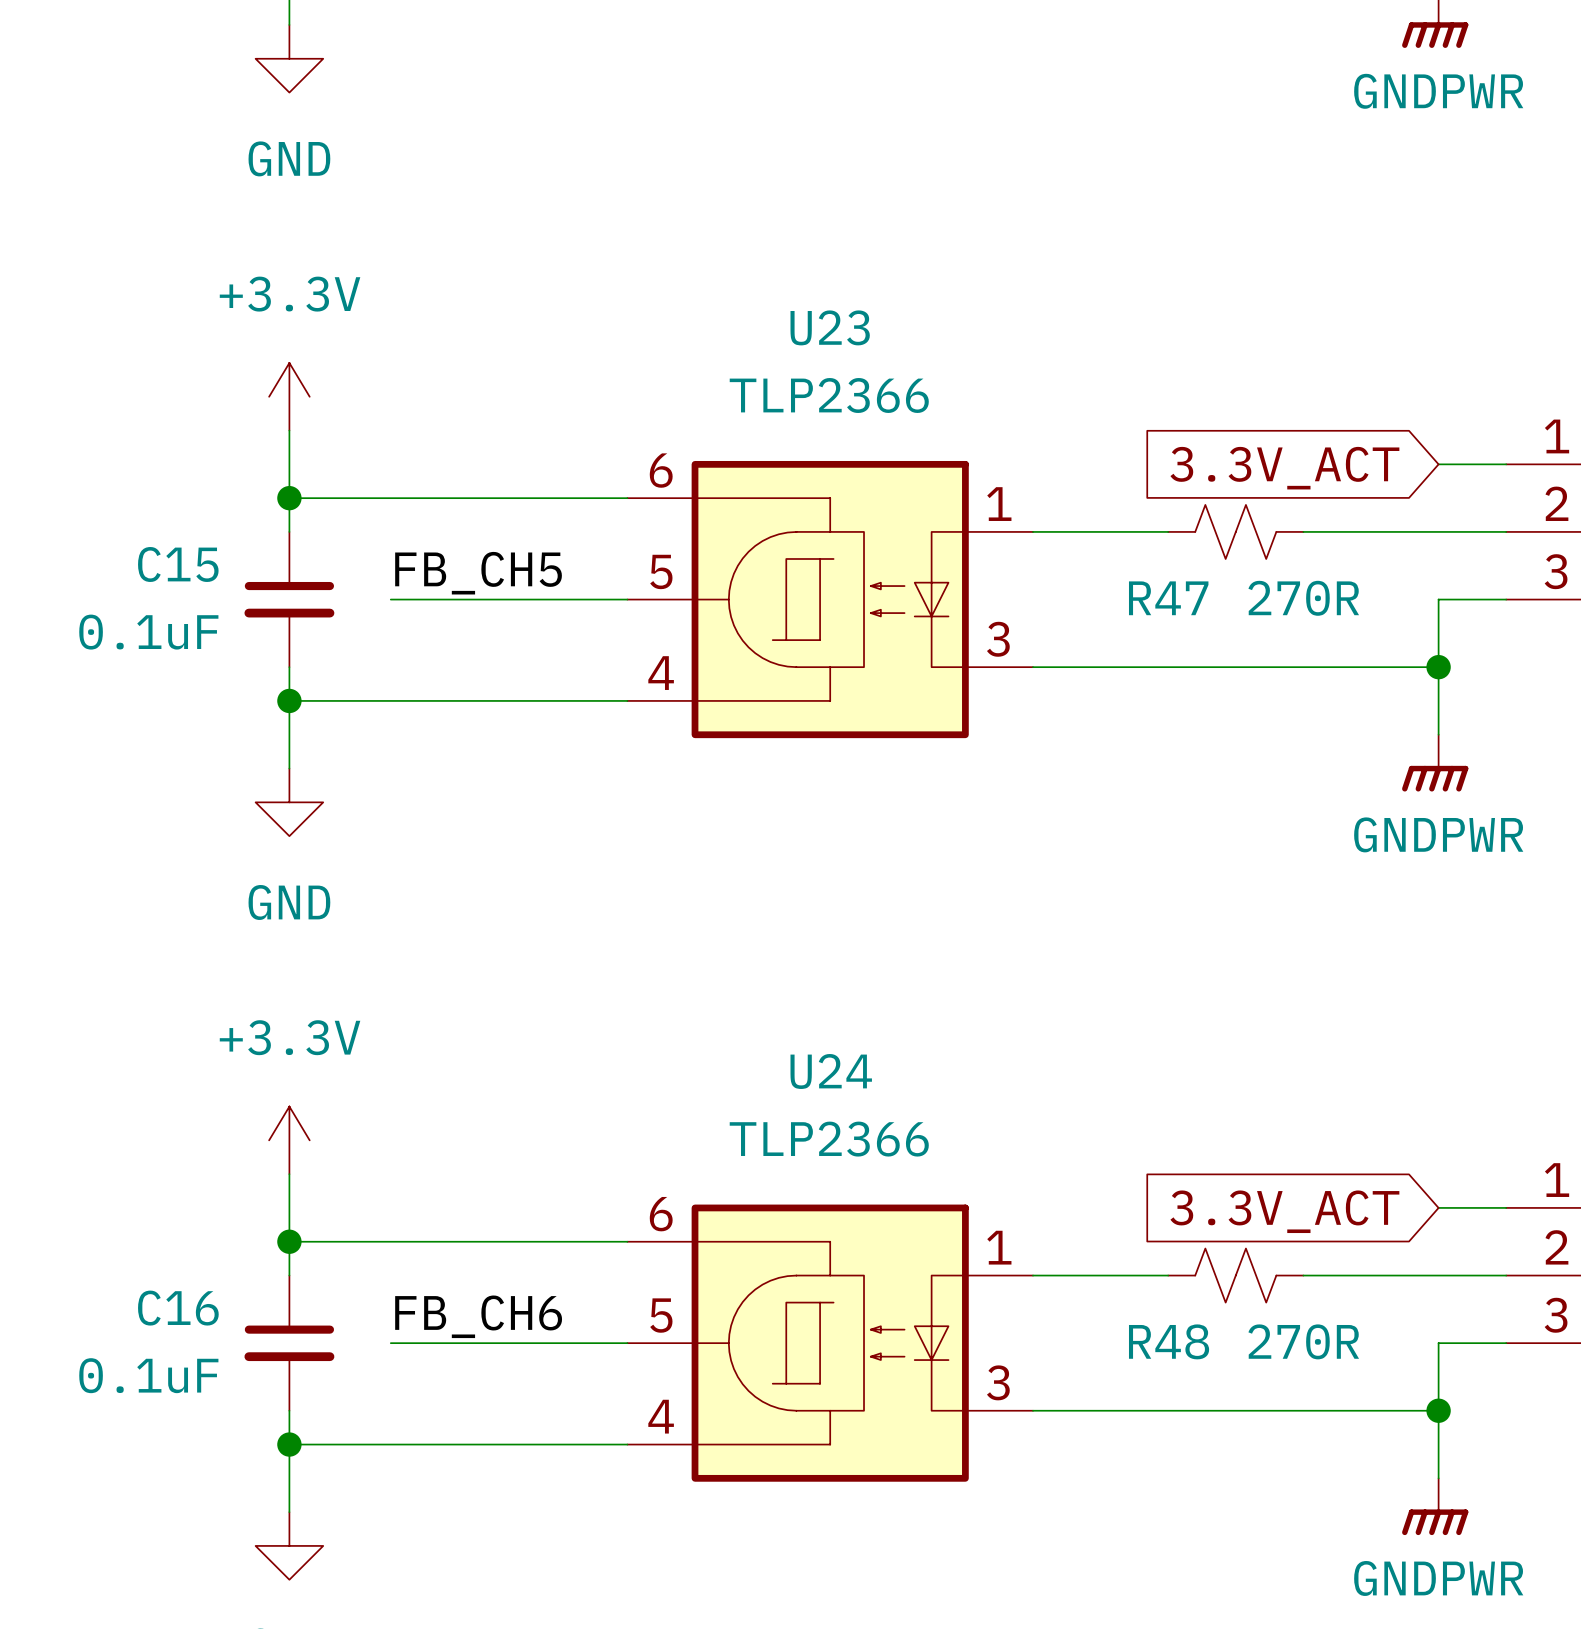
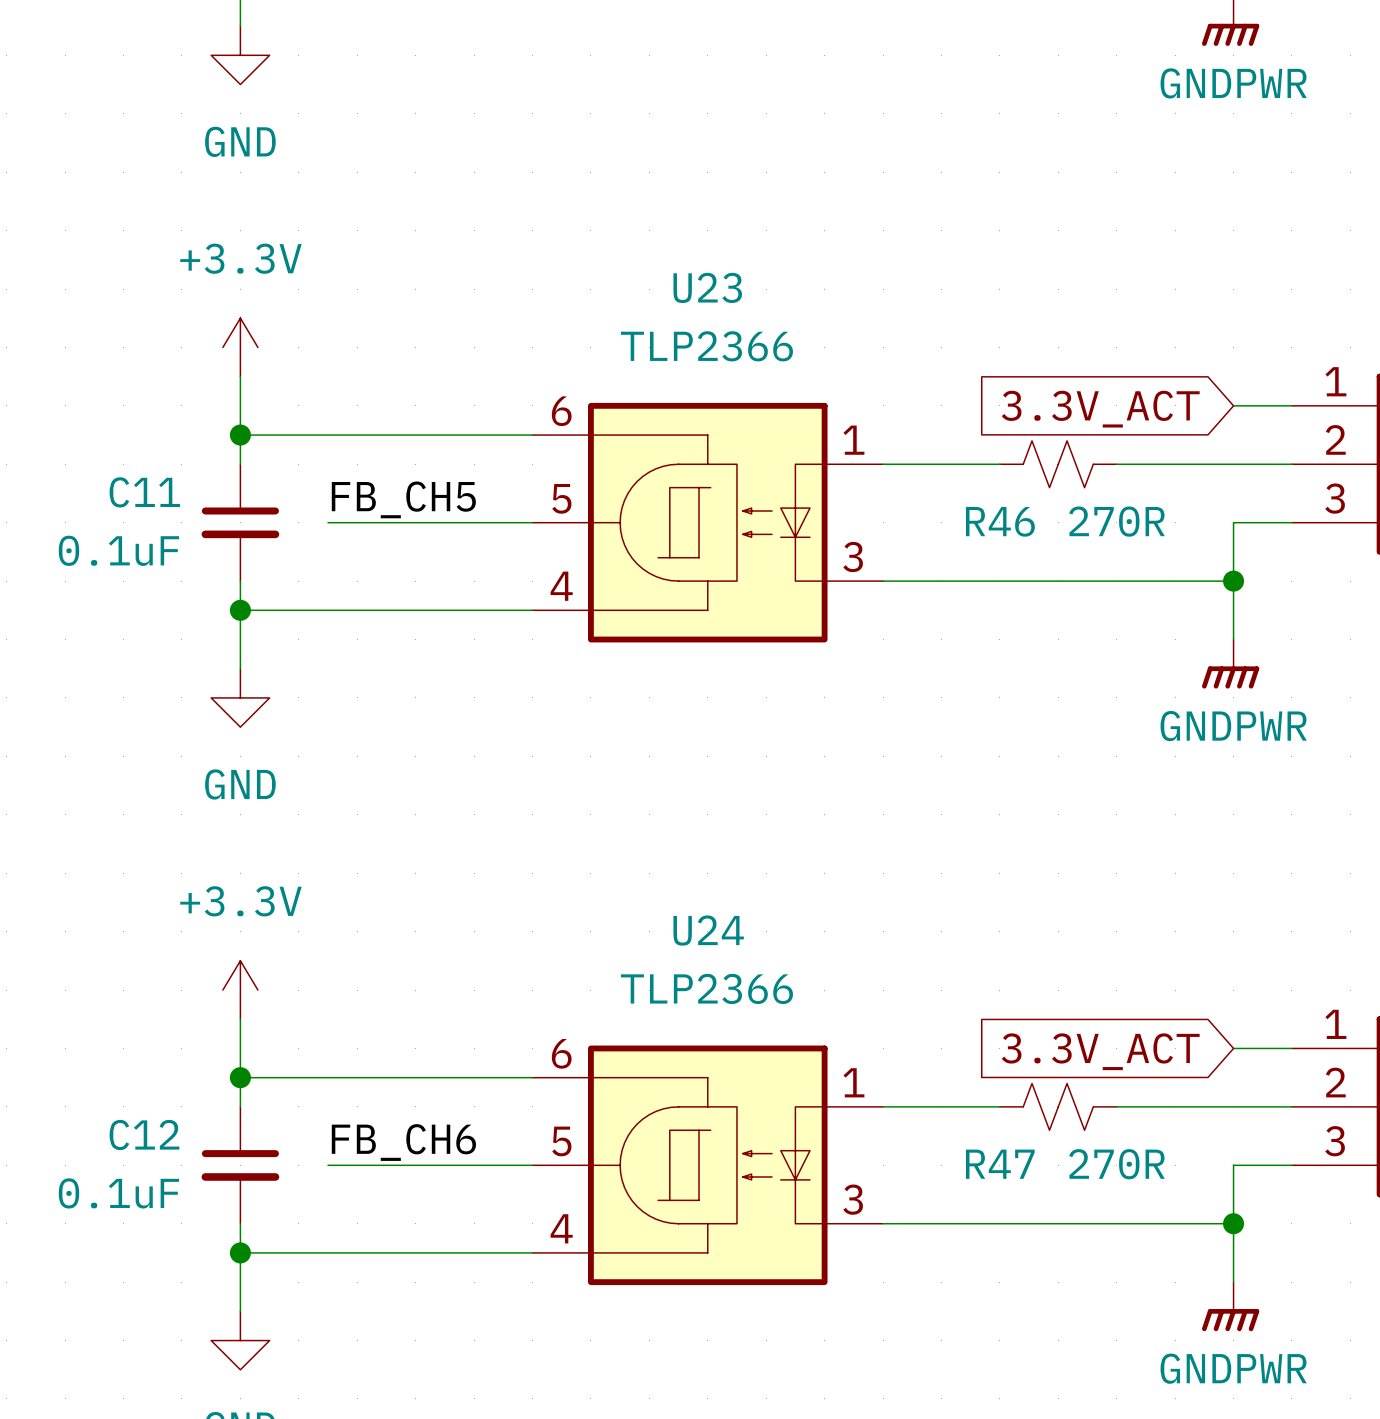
C15 name: C15 (178, 564) -> C11 (144, 492)
R47 name: R47 (1168, 598) -> R46 (1000, 521)
C16 name: C16 (178, 1308) -> C12 (144, 1135)
R48 name: R48 (1169, 1341) -> R47 (1000, 1164)

